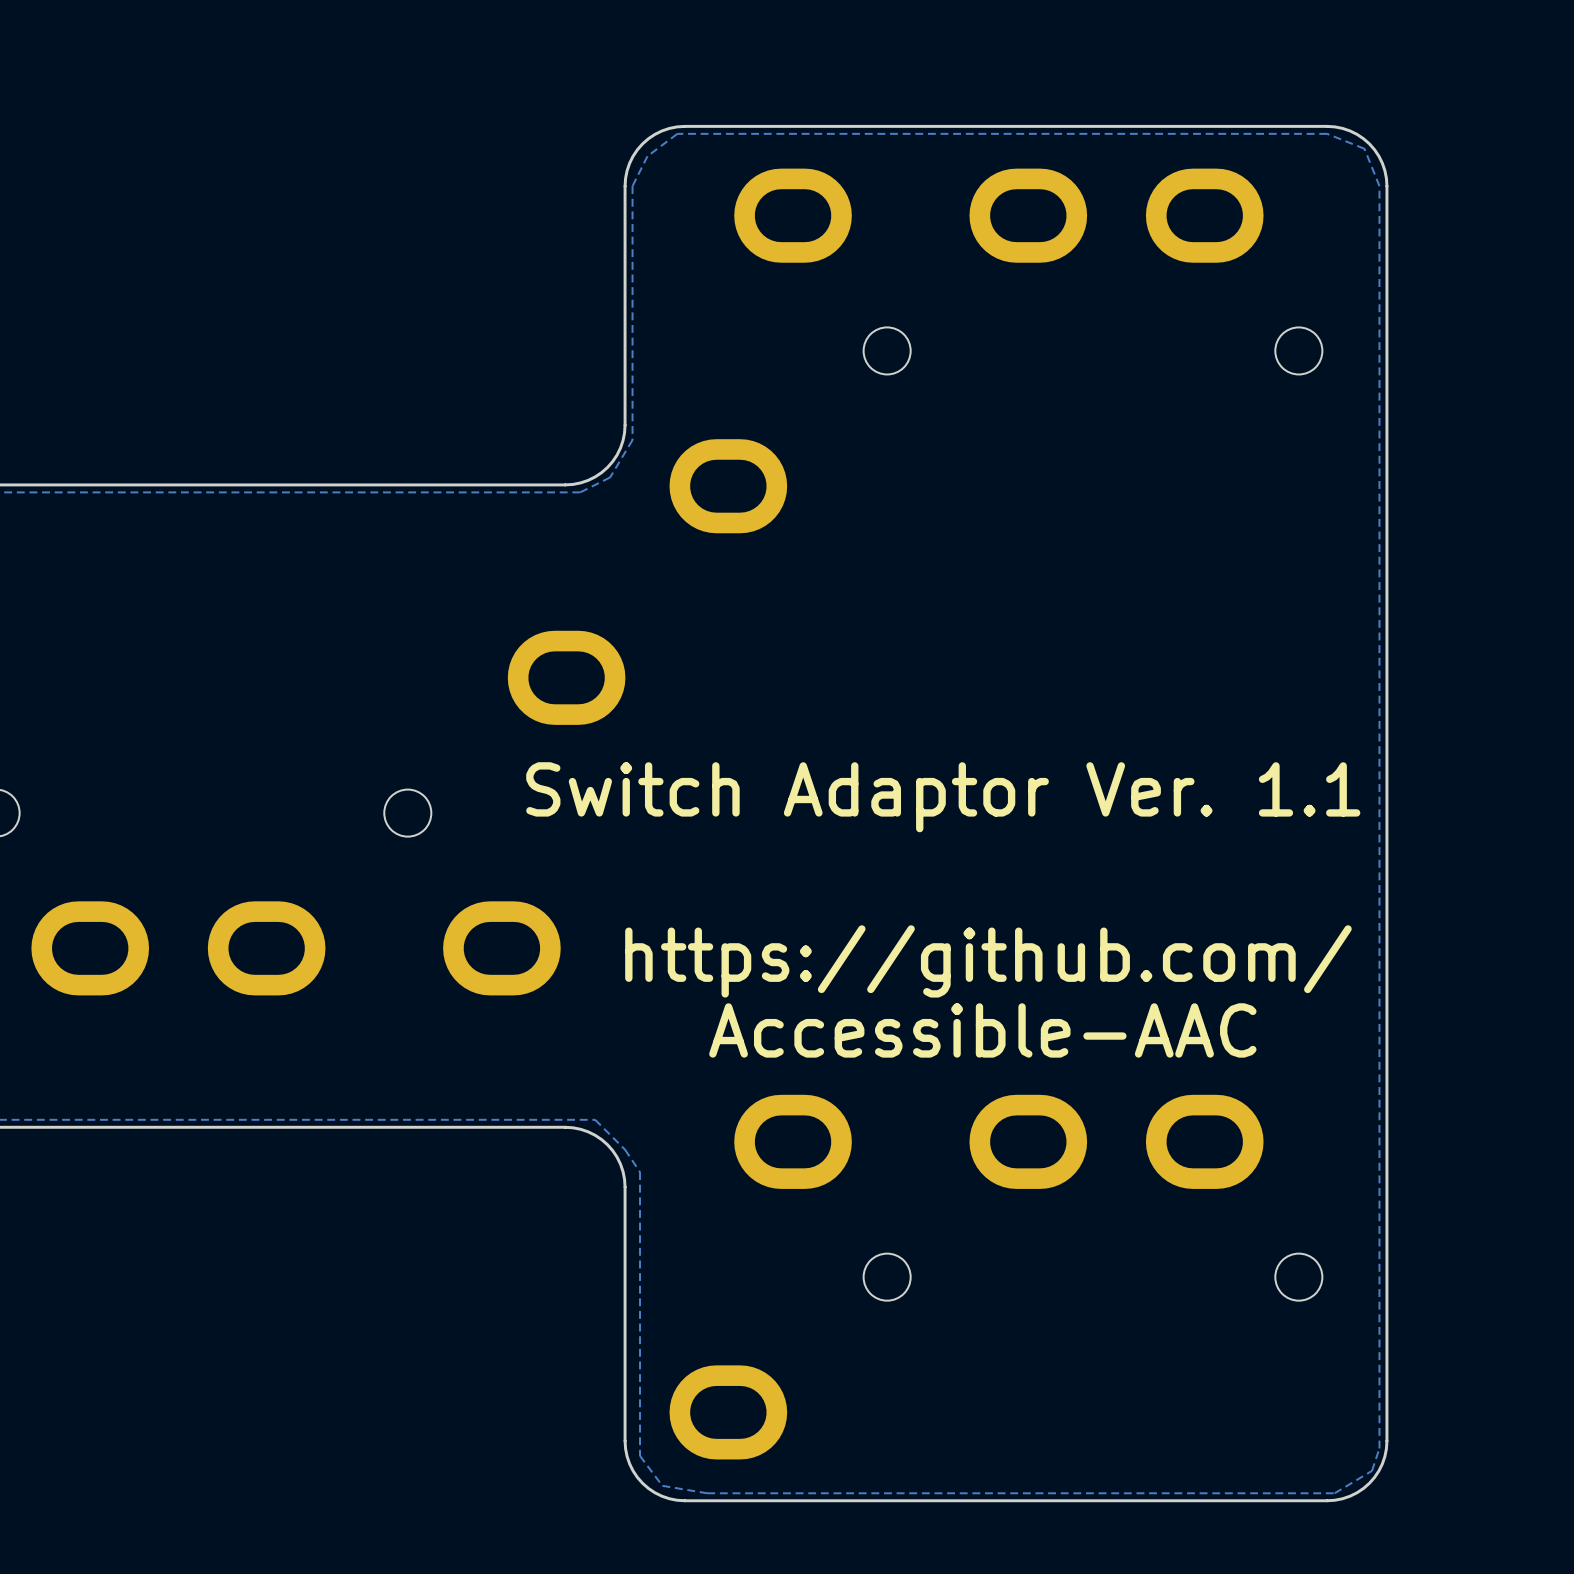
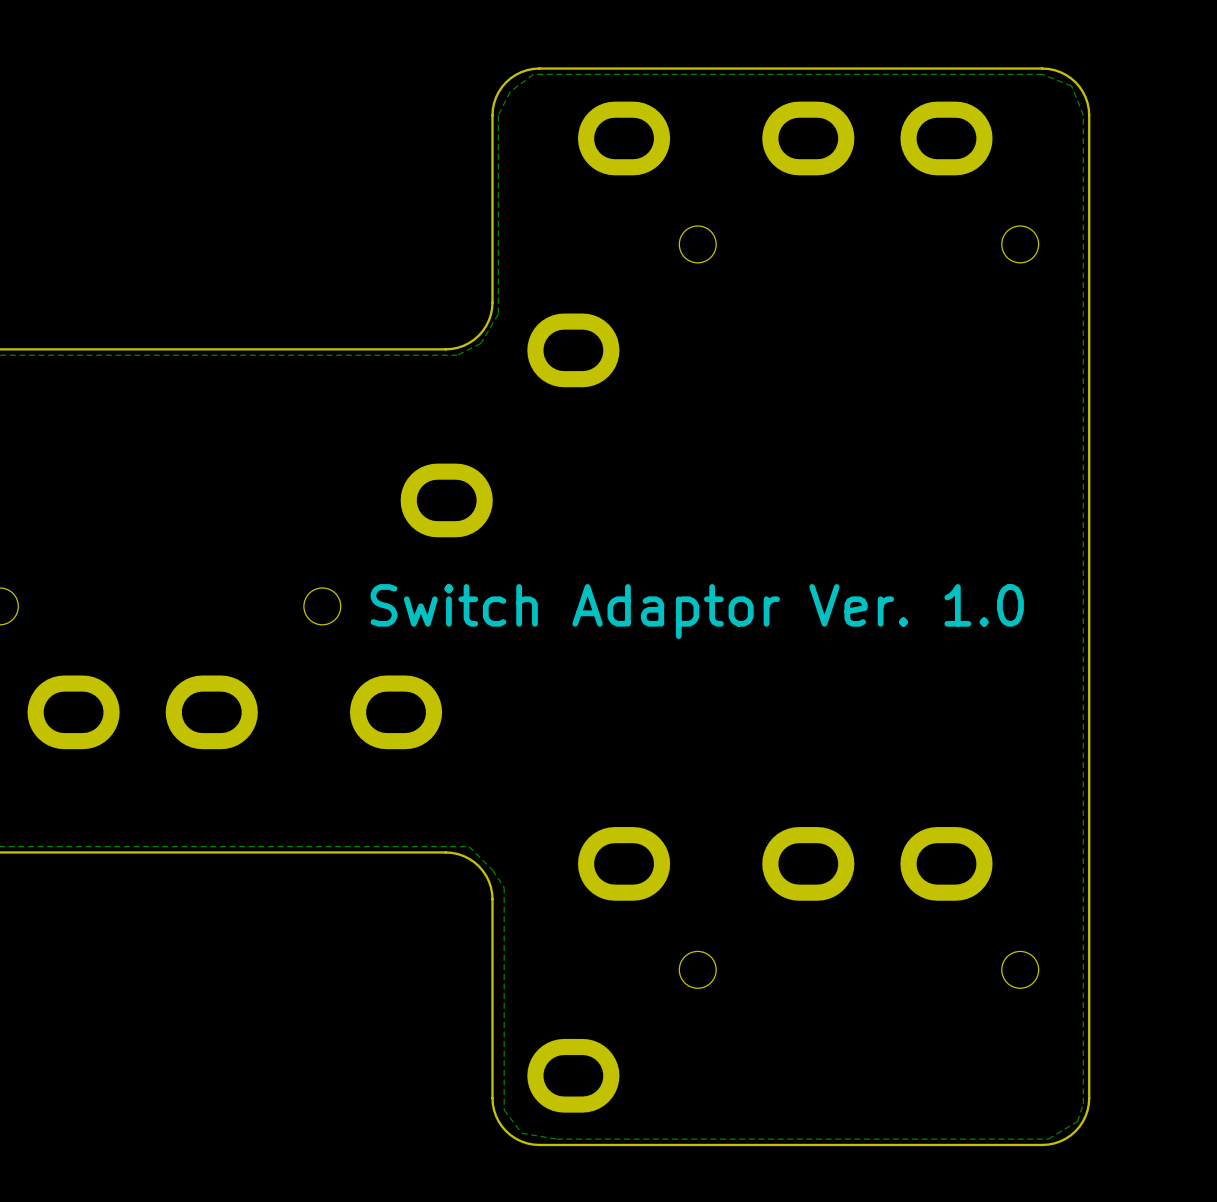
text: Switch Adaptor Ver. 1.1 (943, 797) -> Switch Adaptor Ver. 1.0 (697, 611)
text: https://github.com/ (988, 961) -> none
text: Accessible-AAC (982, 1030) -> none

